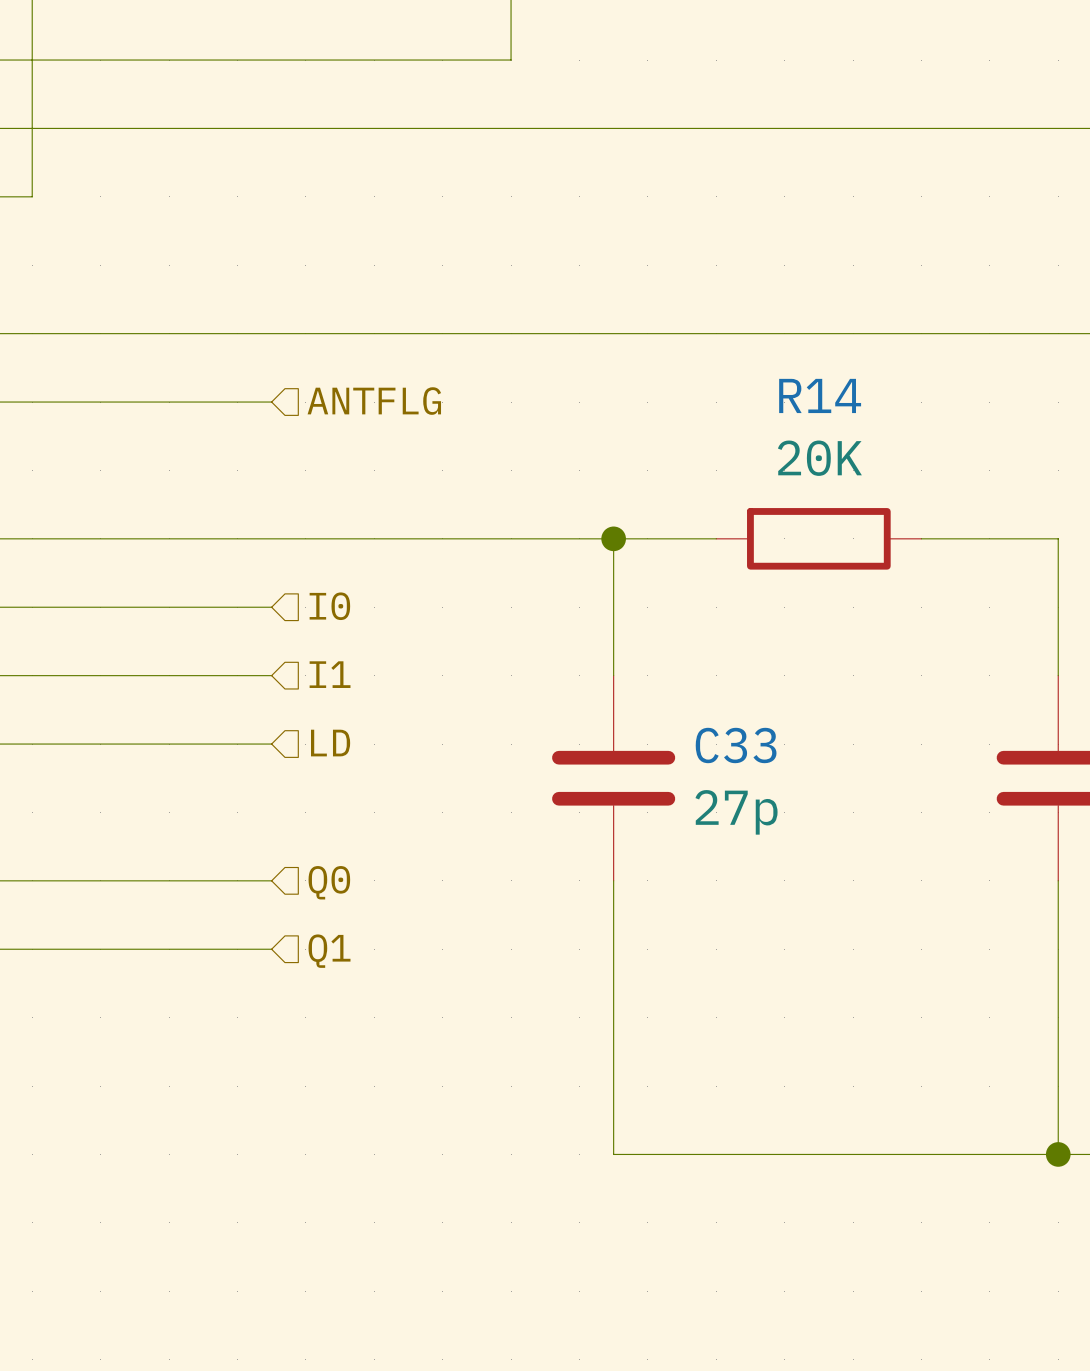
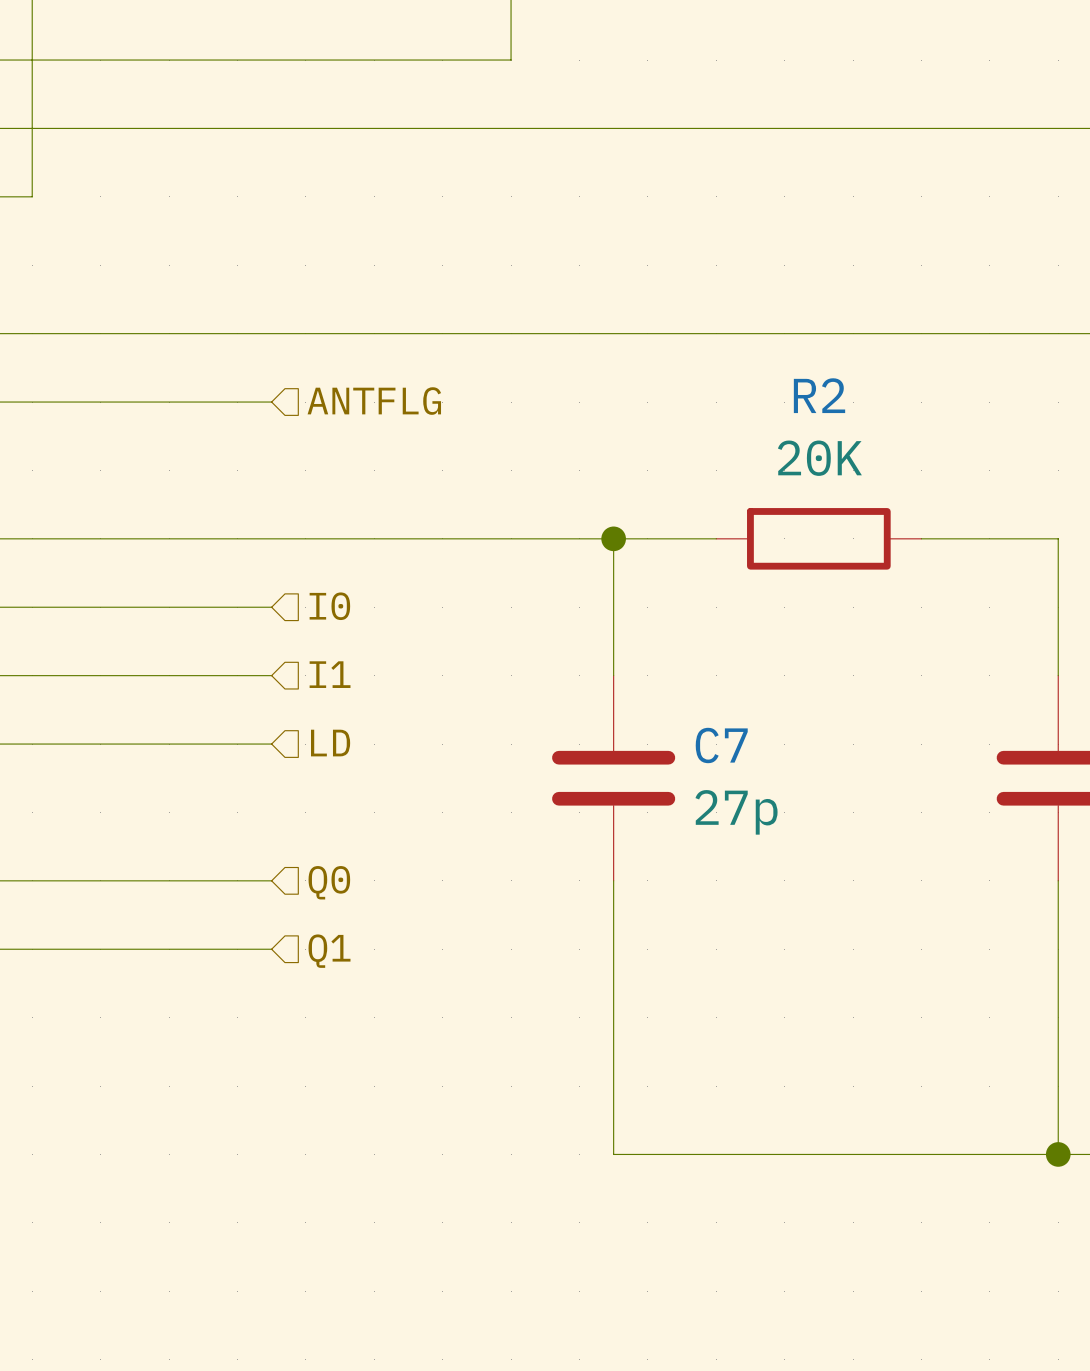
R14 name: R14 (820, 395) -> R2 (819, 395)
C33 name: C33 (736, 745) -> C7 (721, 745)

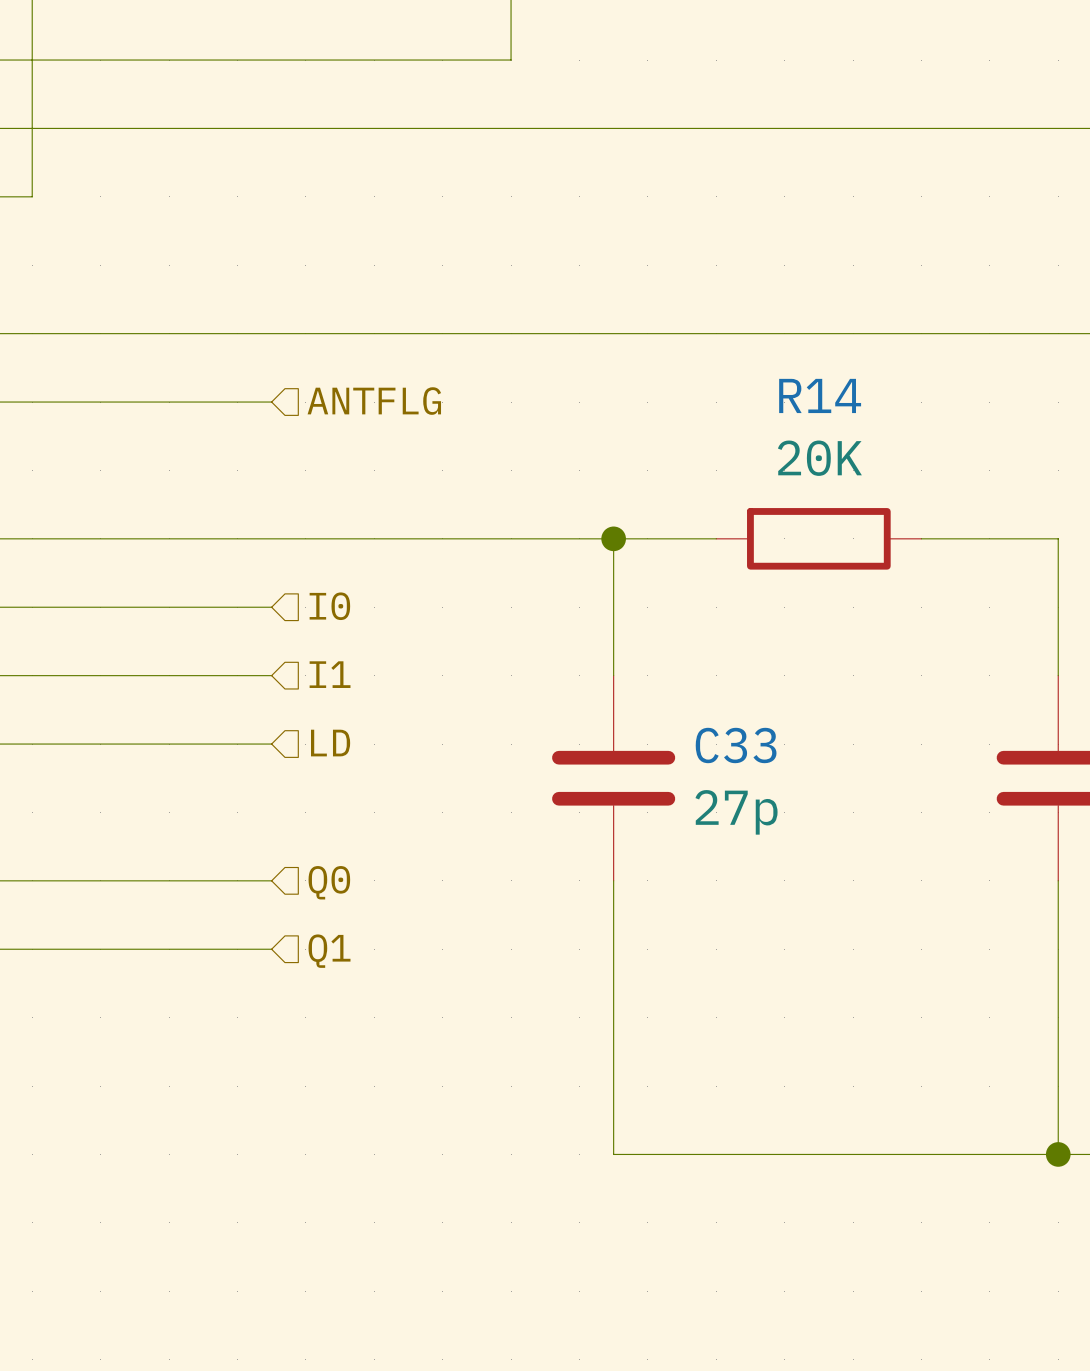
R2 name: R2 (819, 395) -> R14 (820, 395)
C7 name: C7 (721, 745) -> C33 (736, 745)

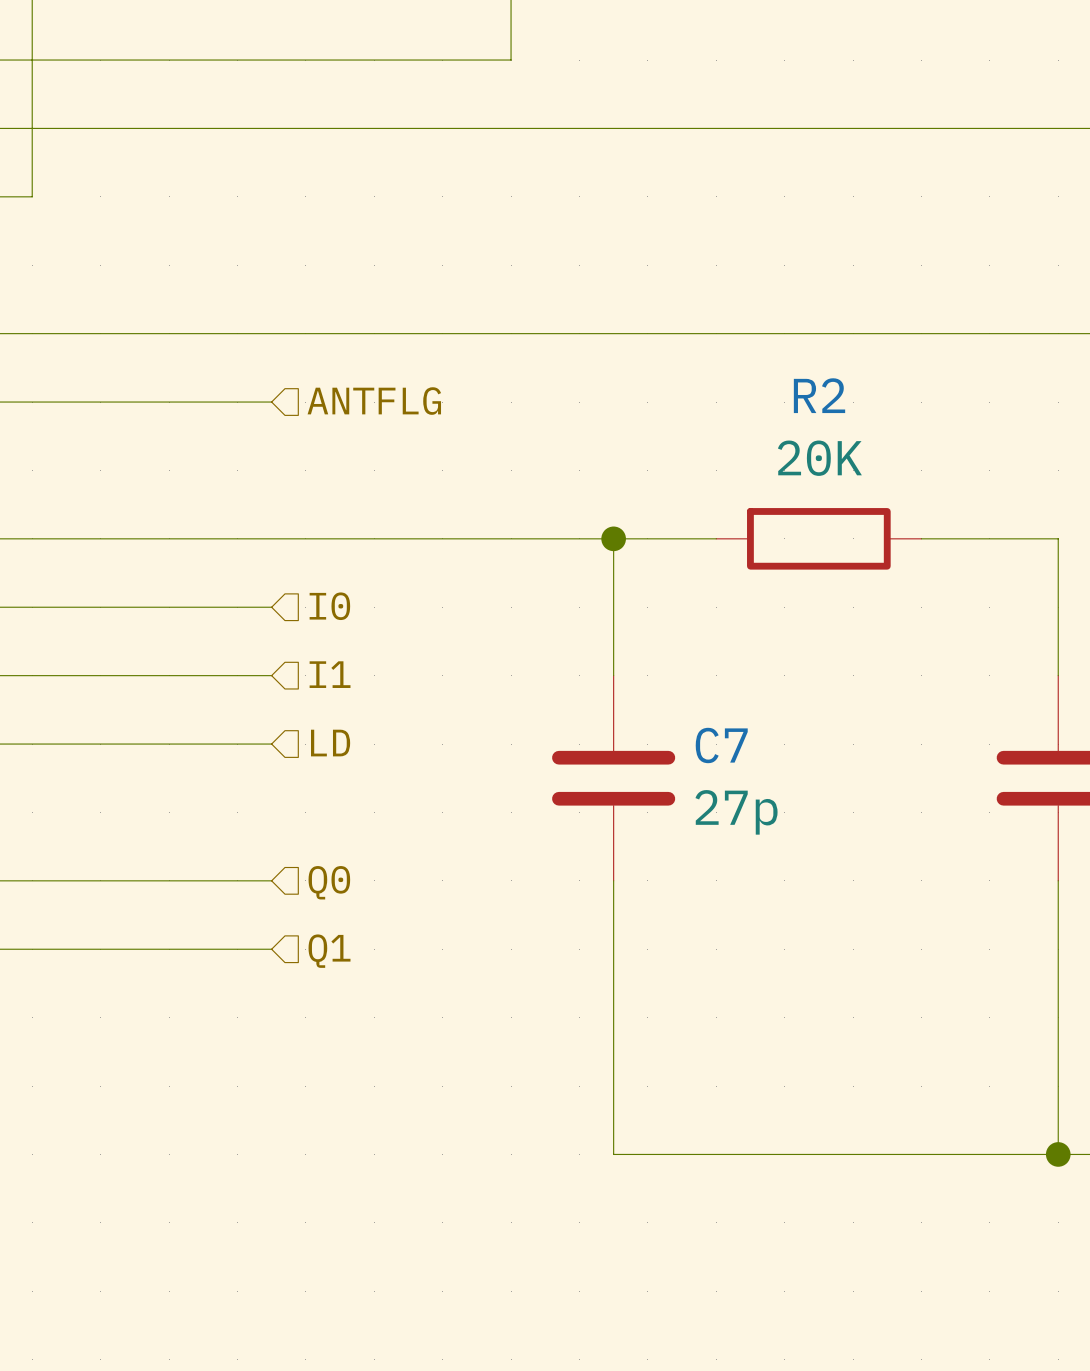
R14 name: R14 (820, 395) -> R2 (819, 395)
C33 name: C33 (736, 745) -> C7 (721, 745)

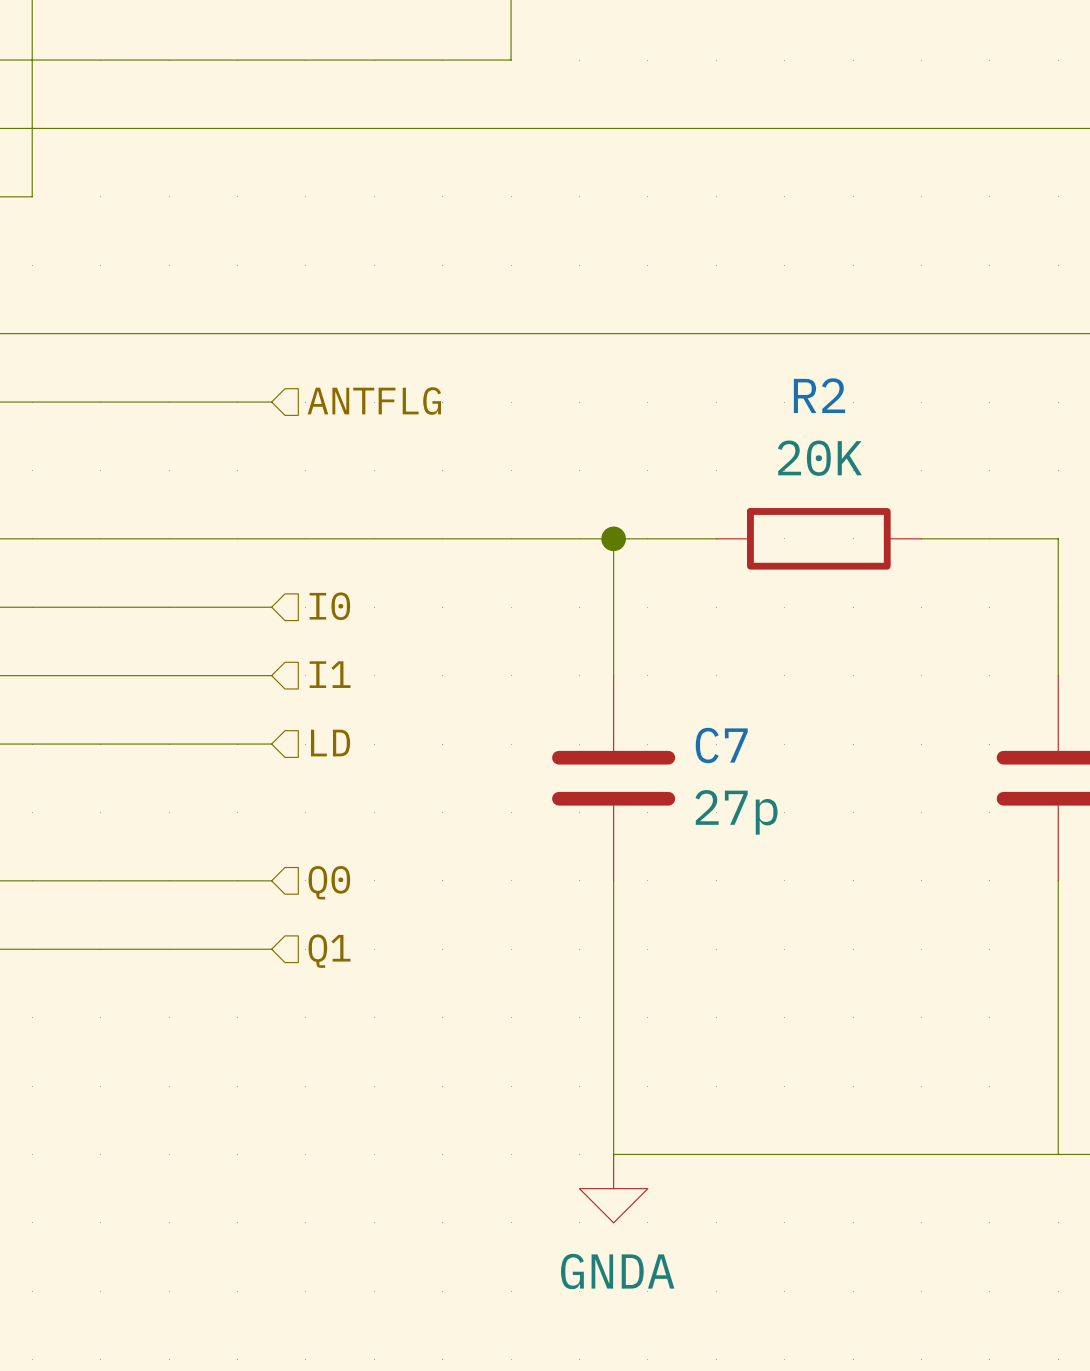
junction: (1058, 1154) -> none
power symbol: none -> GNDA (613, 1188)

